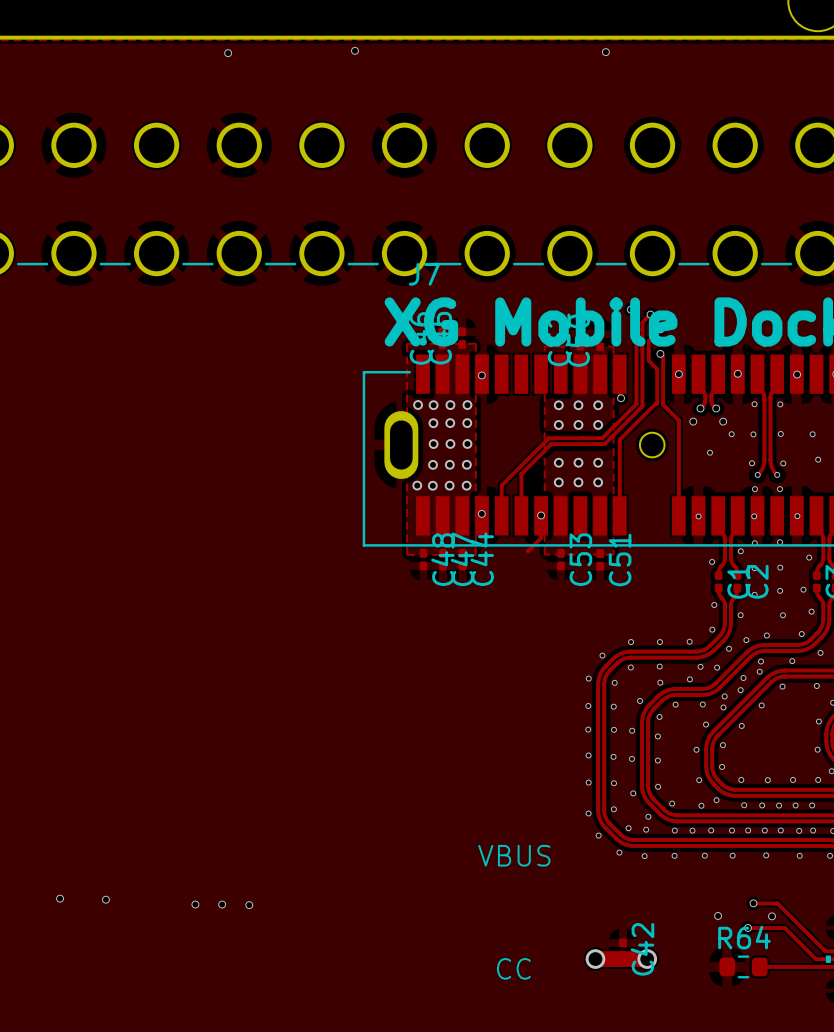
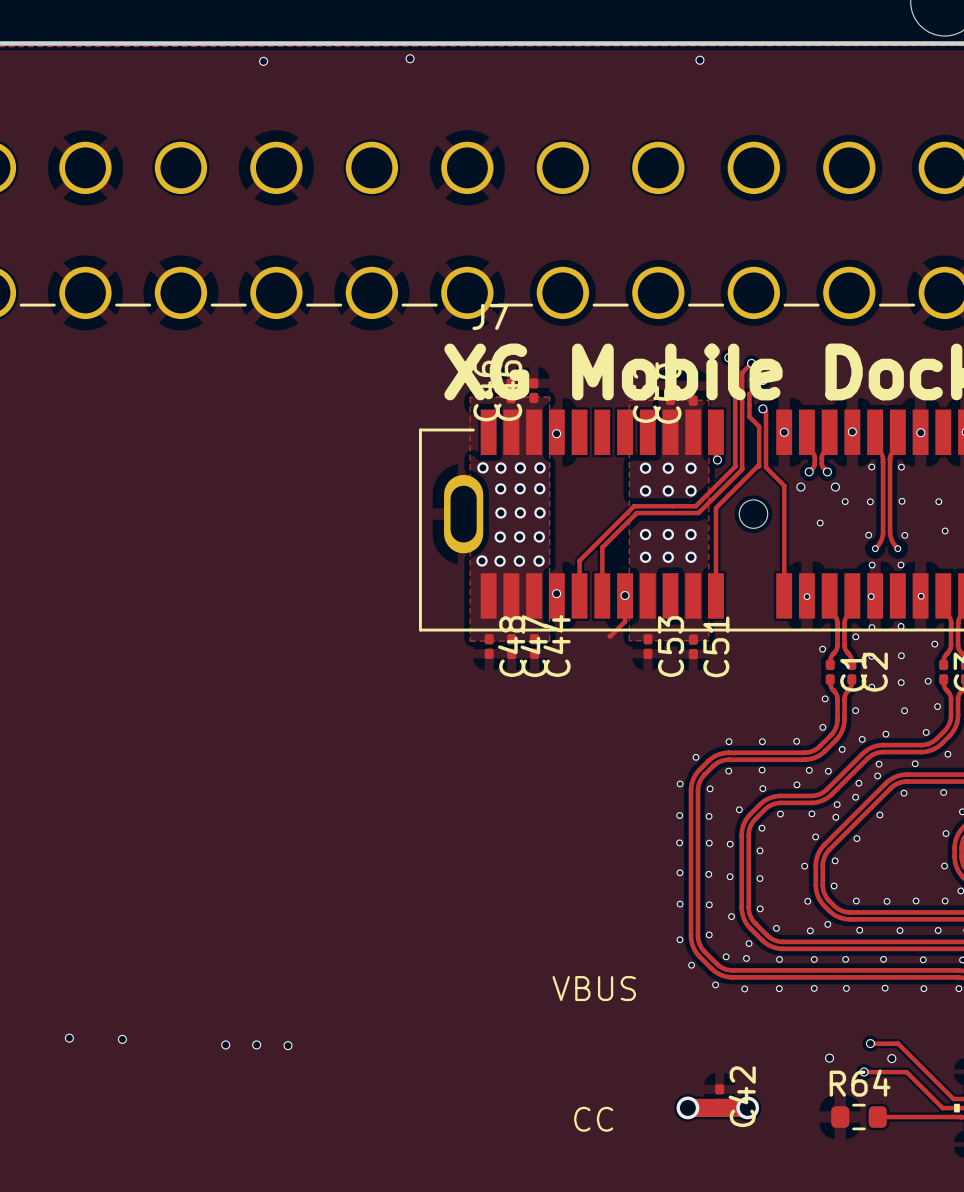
via: (762, 805) -> none
via: (795, 805) -> none
via: (692, 830) -> none
via: none -> (814, 959)
via: (711, 830) -> none
via: (748, 830) -> none
via: (780, 830) -> none
via: (813, 830) -> none

